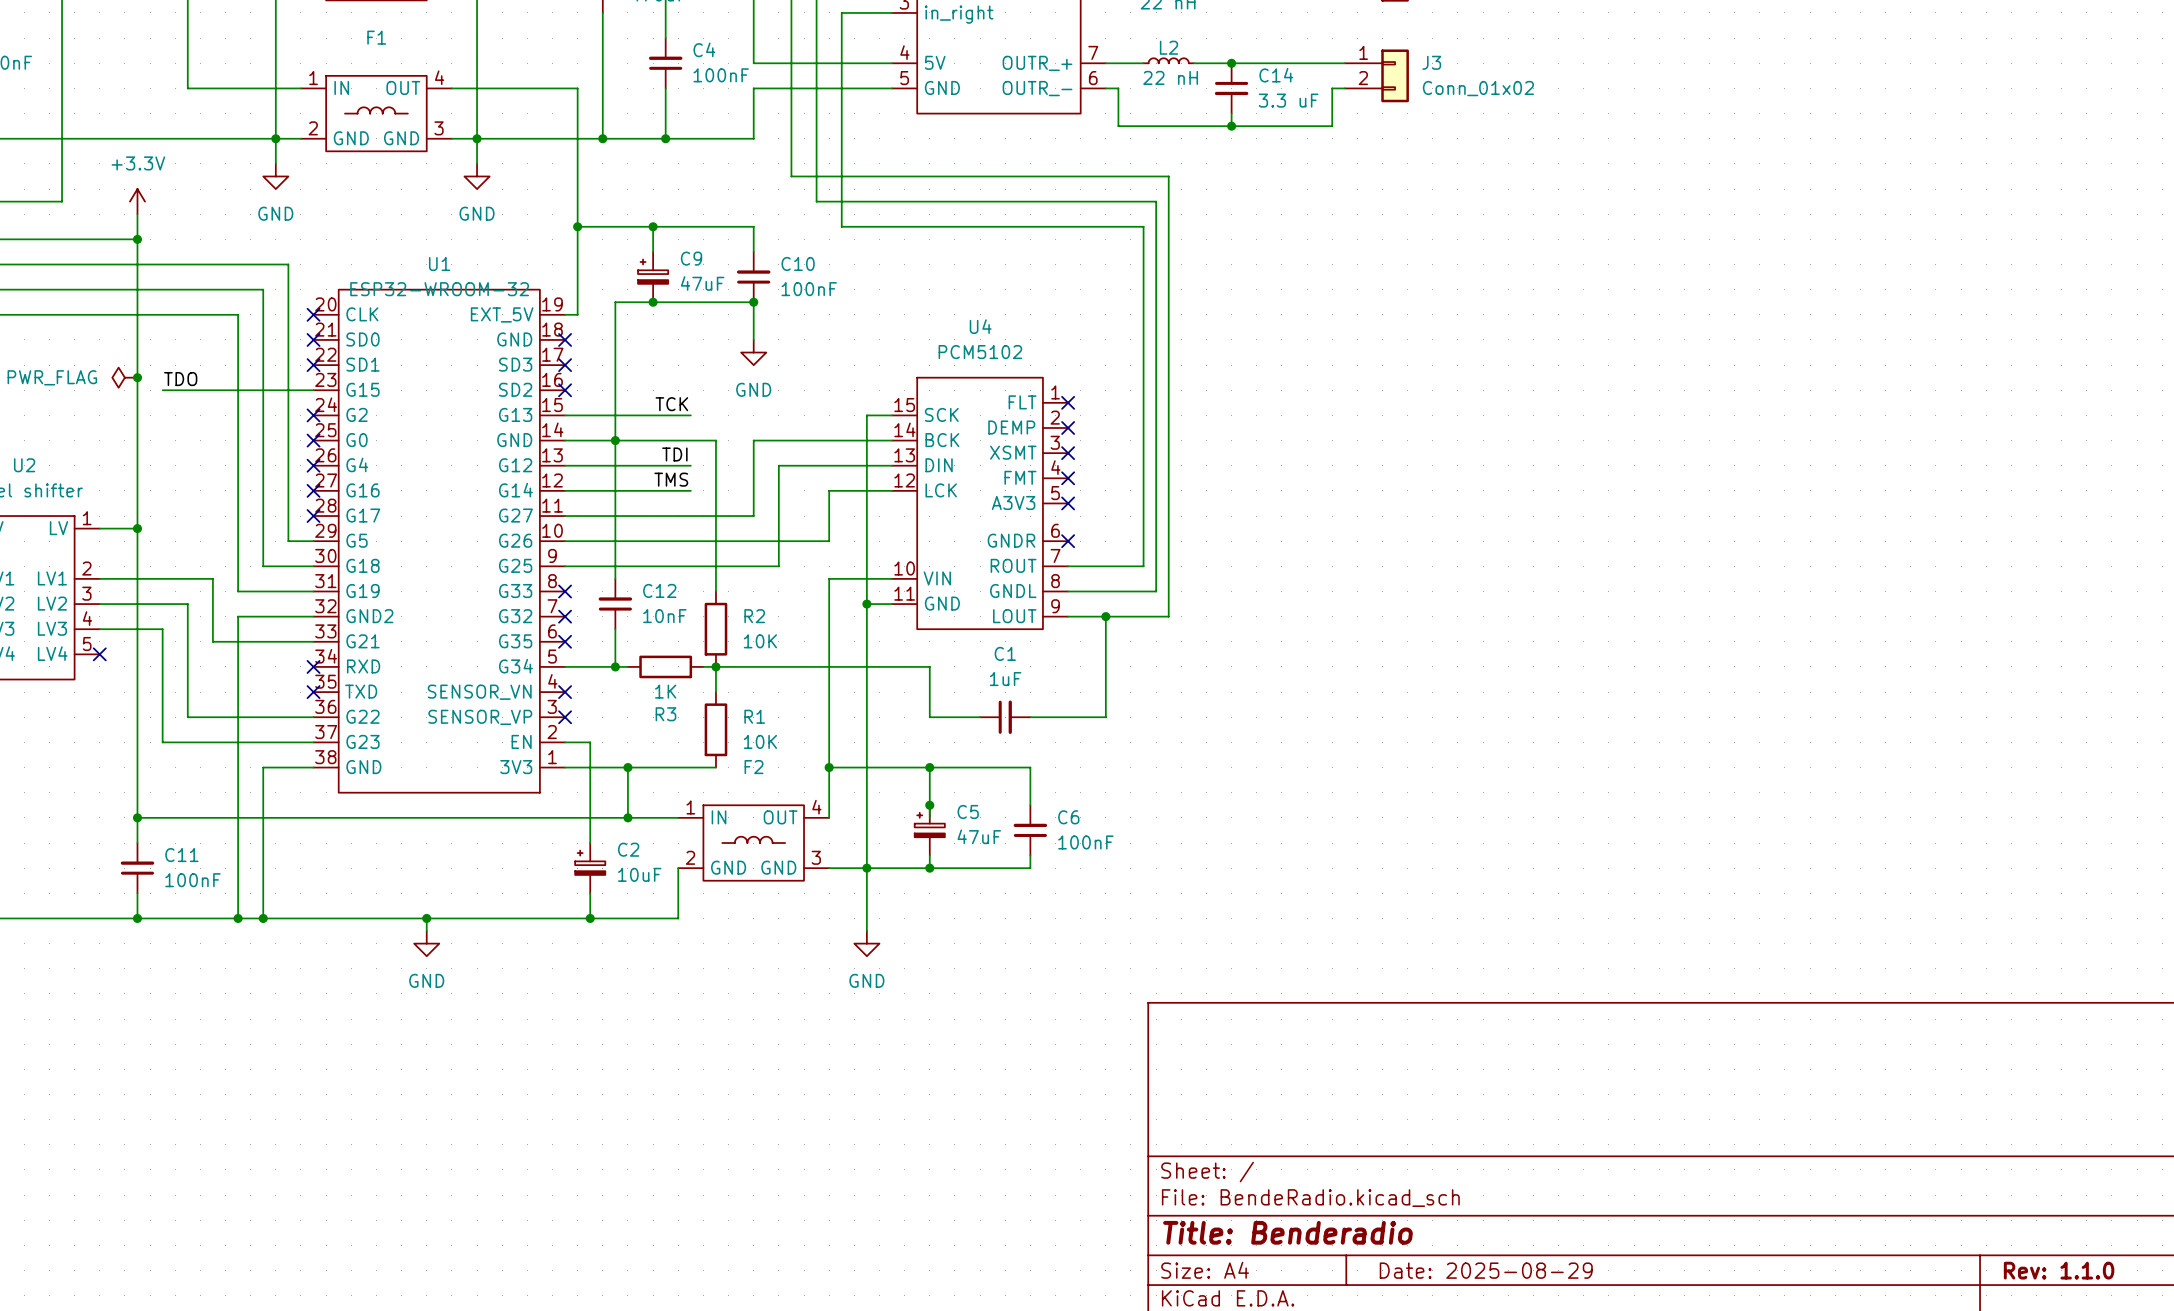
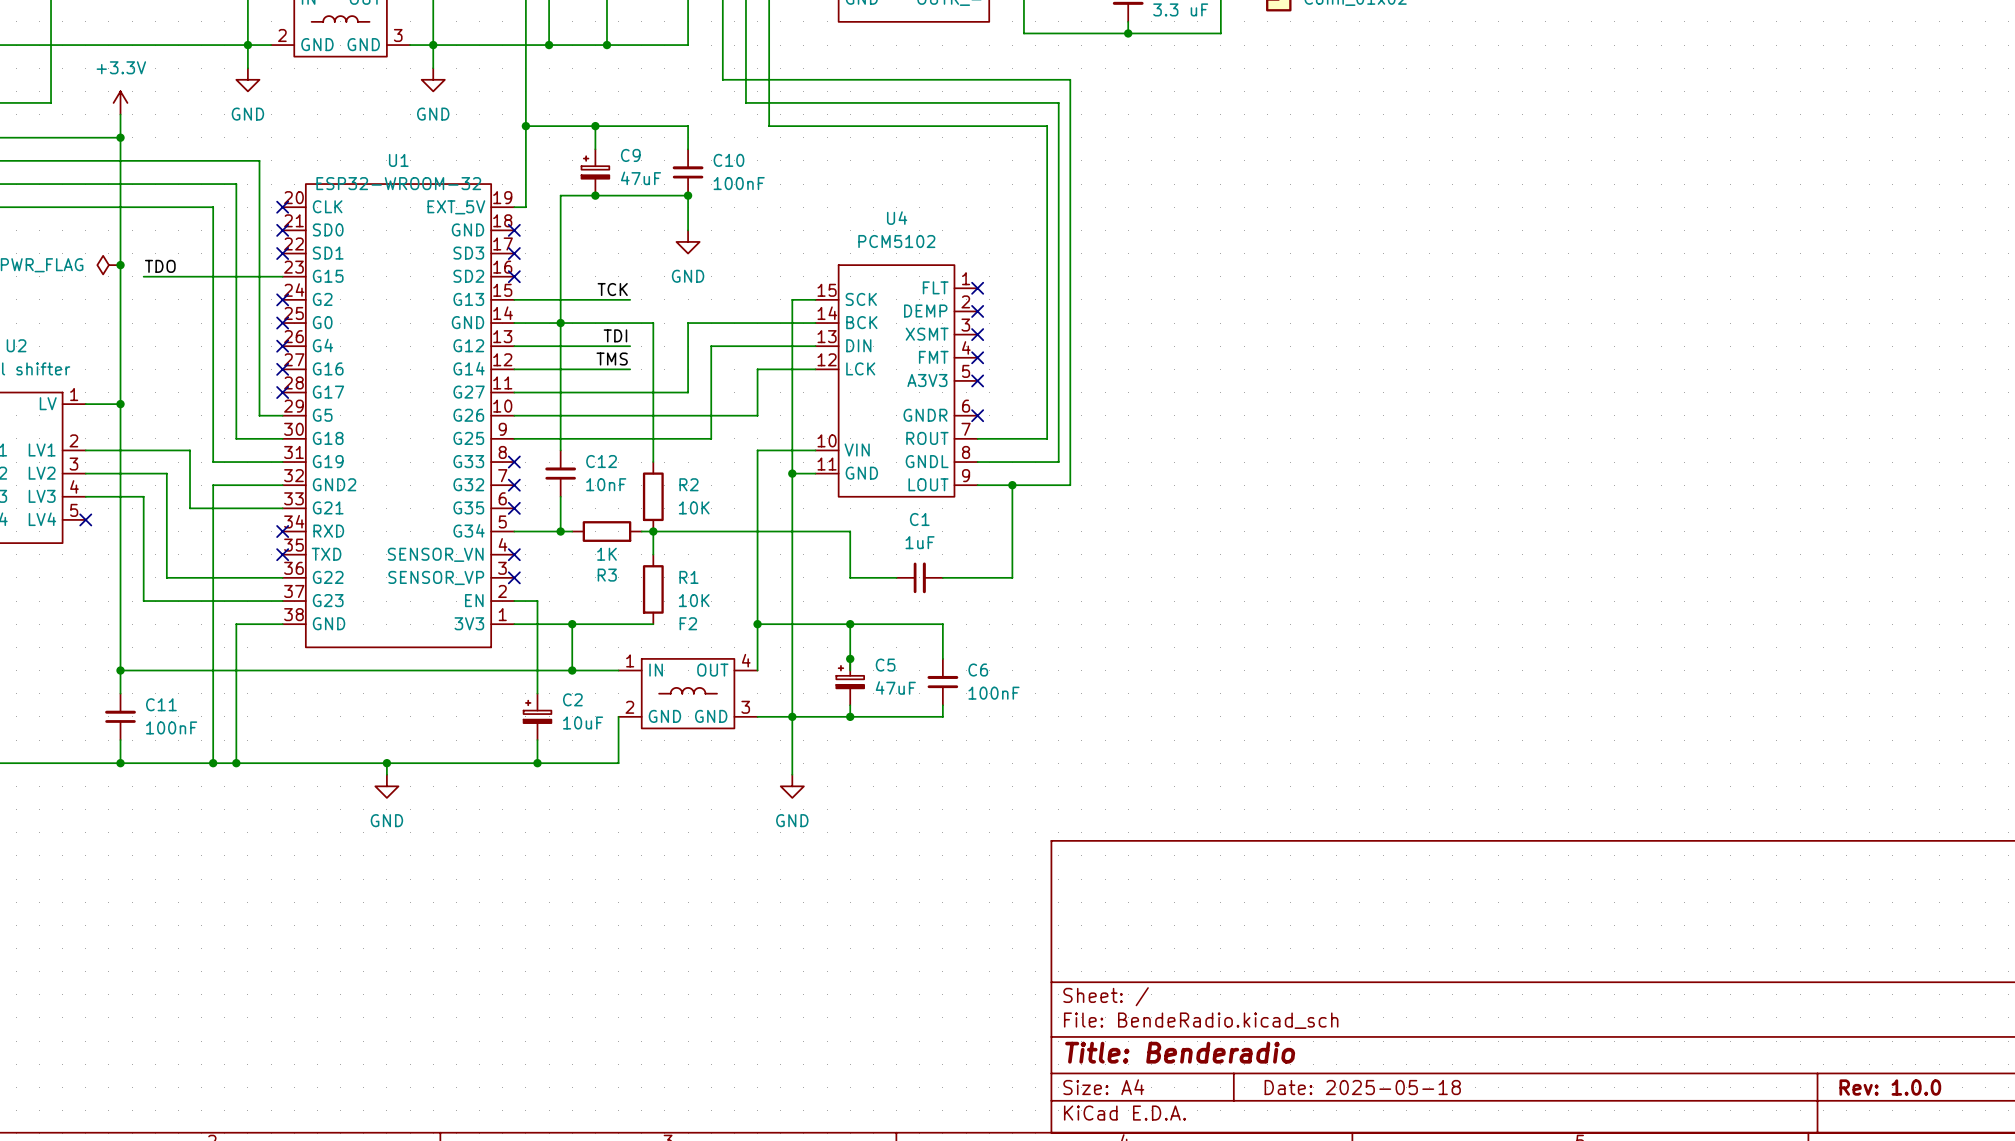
title block: Date: 2025-08-29 (1486, 1270) -> Date: 2025-05-18 (1362, 1087)
title block: Rev: 1.1.0 (2059, 1270) -> Rev: 1.0.0 (1890, 1087)

